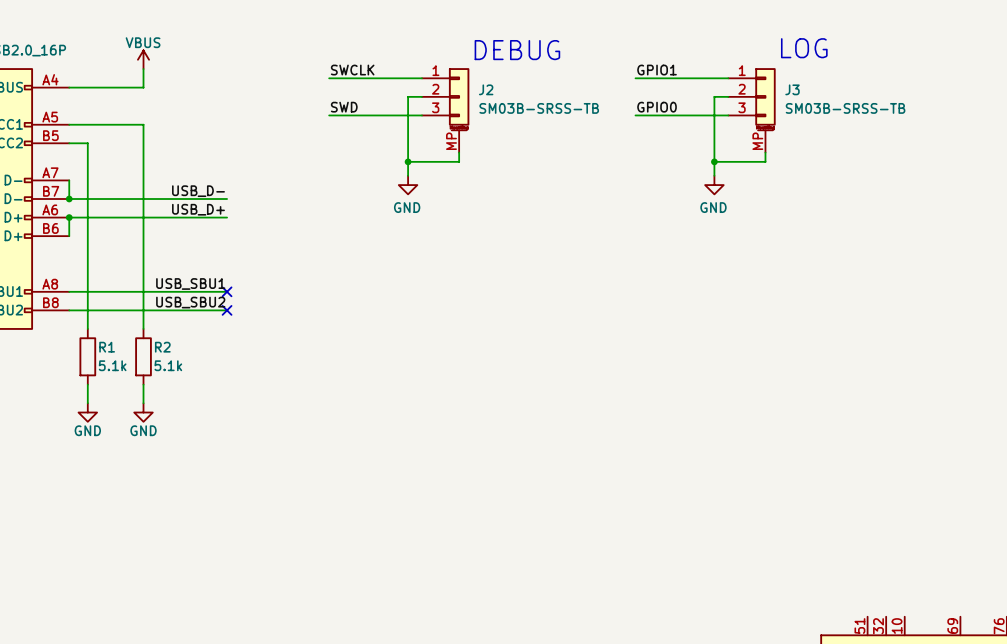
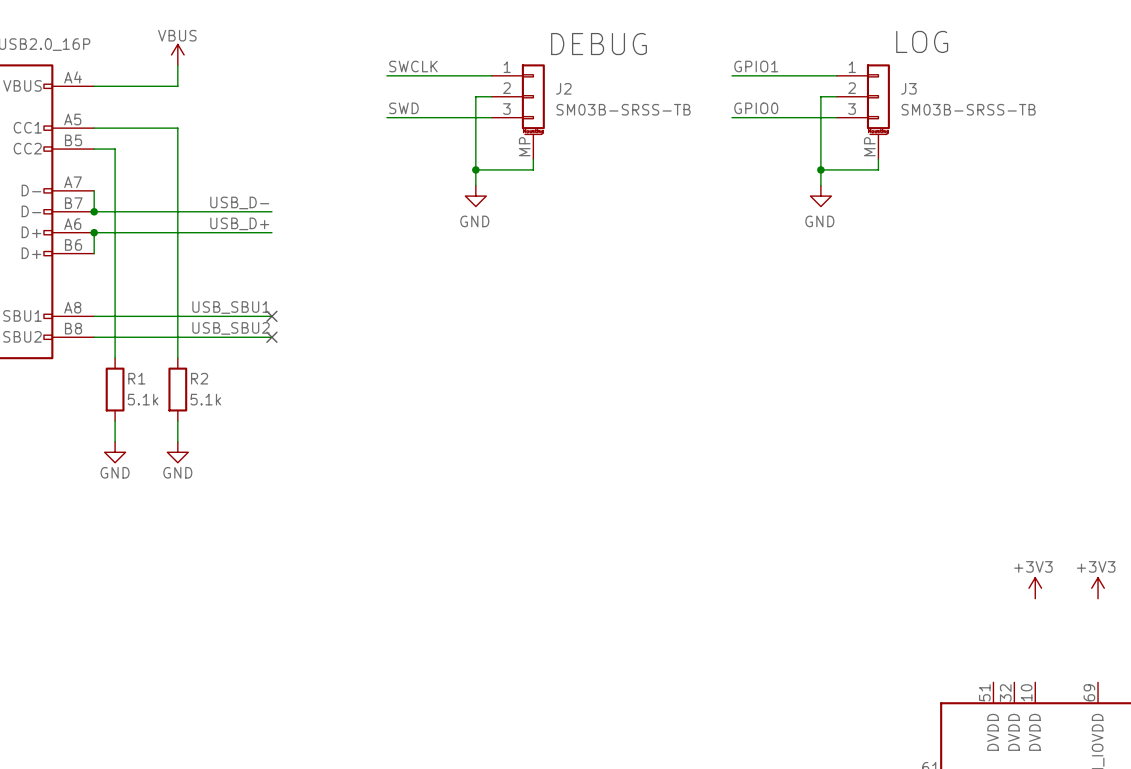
power symbol: none -> +3V3 (1035, 588)
power symbol: none -> +3V3 (1098, 588)

